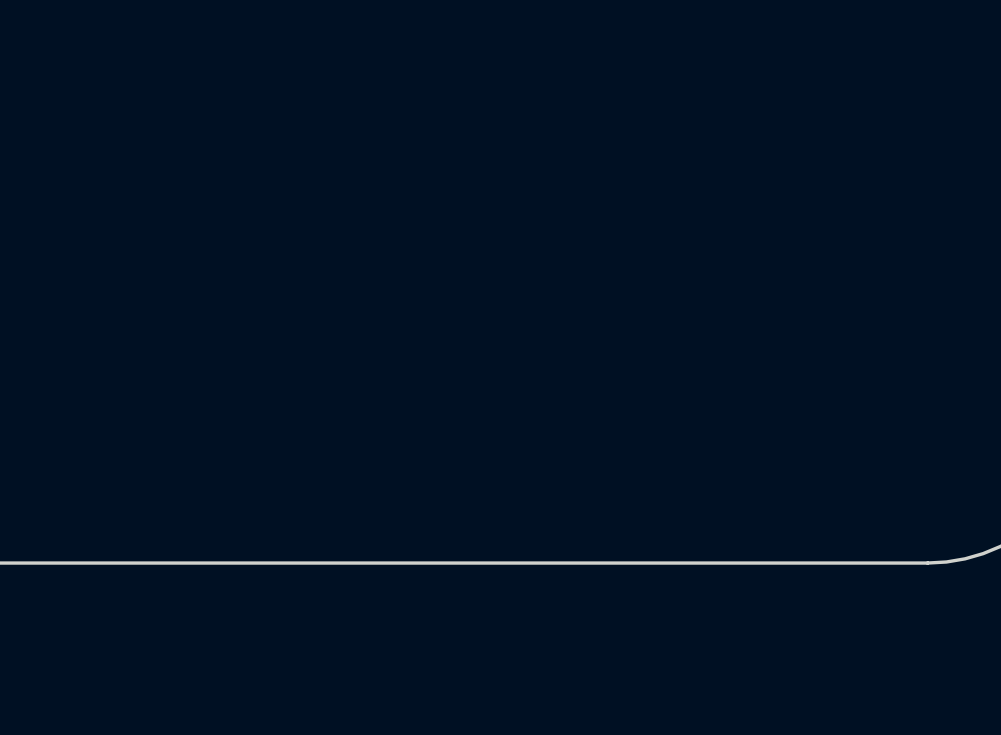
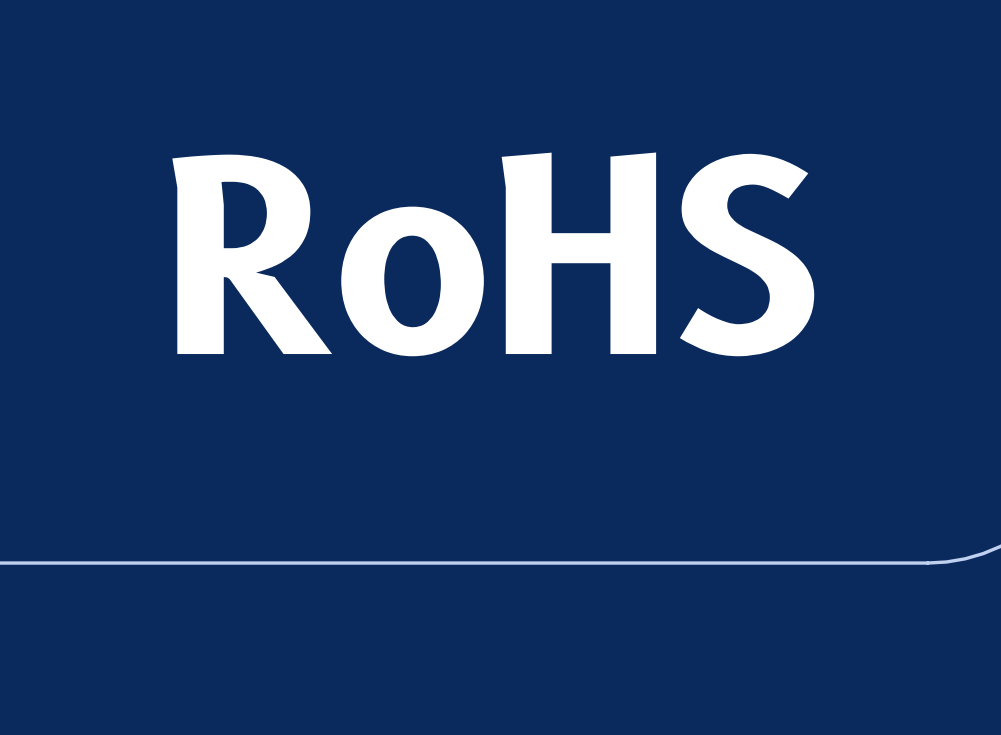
text: none -> RoHS (493, 254)

